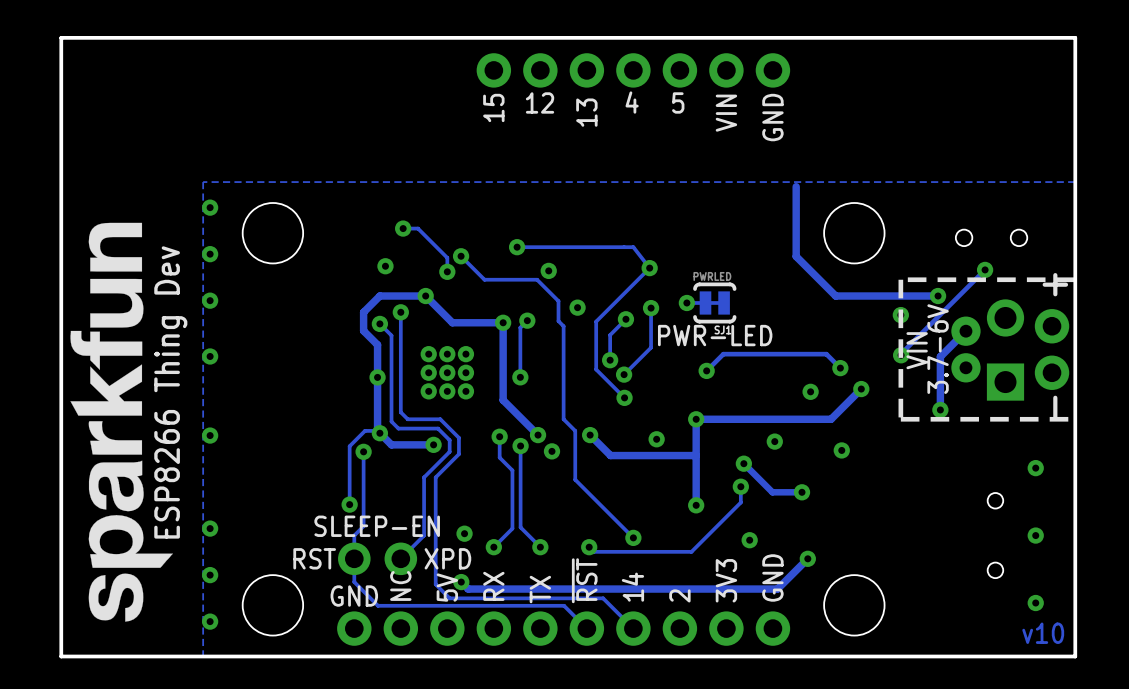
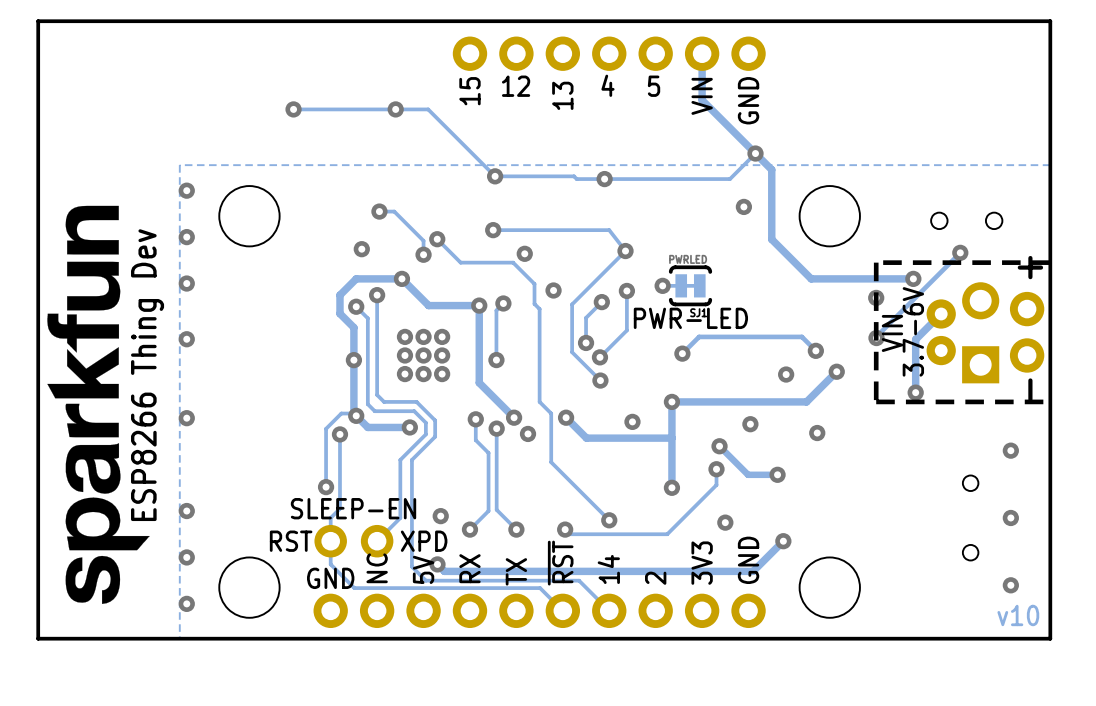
track: none -> (702, 53) (702, 100) (771, 169)
track: none -> (293, 109) (428, 109) (495, 176) (574, 176) (576, 179) (729, 179) (755, 153)
via: none -> (293, 109)
via: none -> (395, 109)
via: none -> (755, 153)
via: none -> (495, 176)
via: none -> (604, 179)
via: none -> (743, 206)

